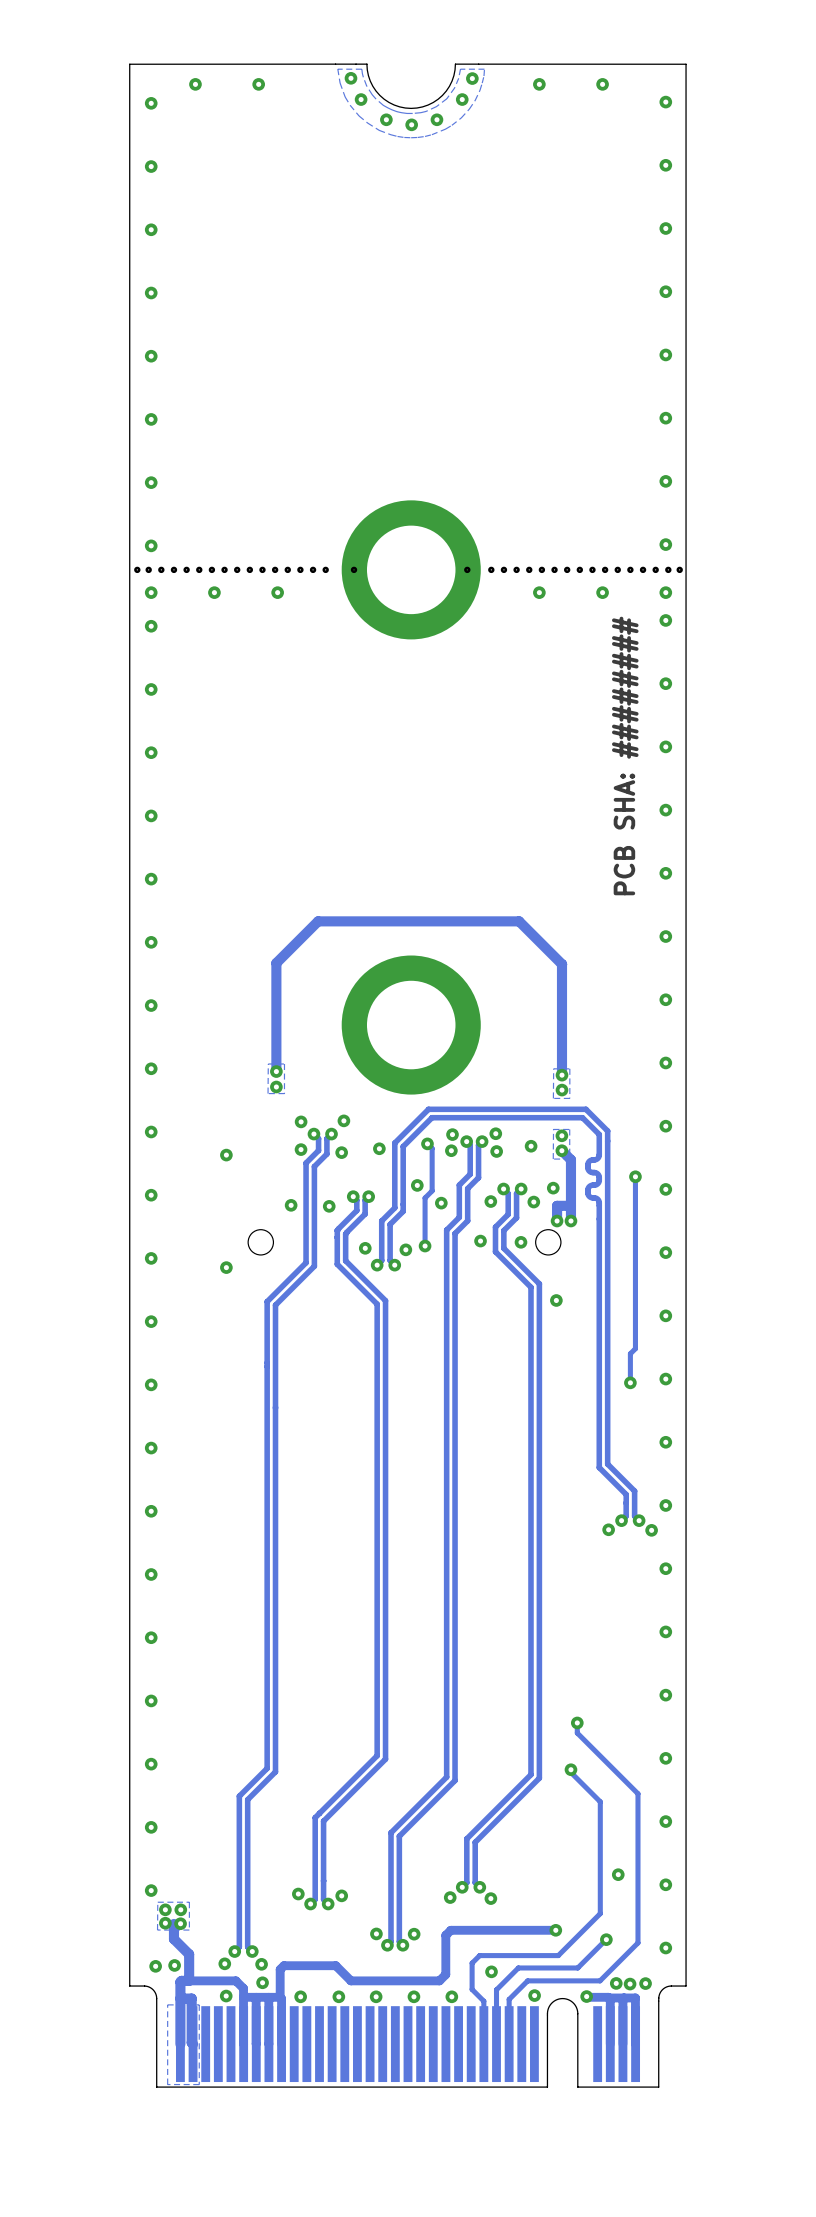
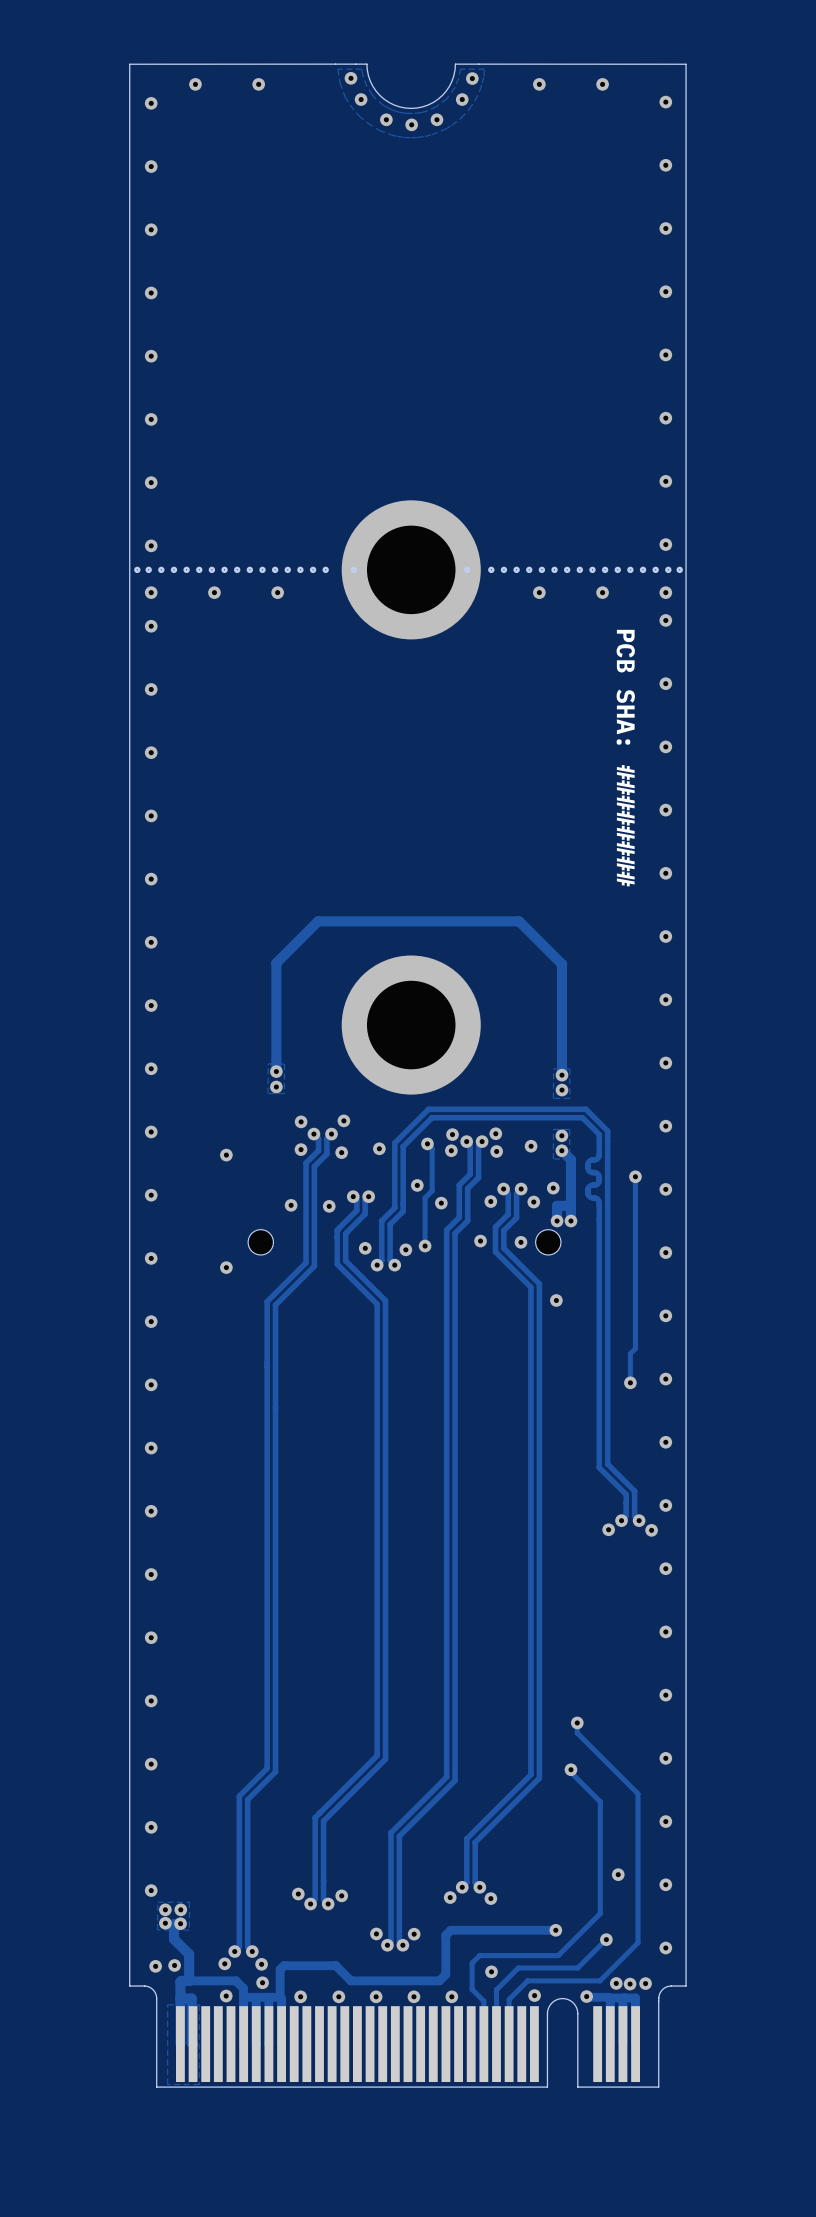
text rotation: 0° (625, 755) -> 180° (625, 758)

